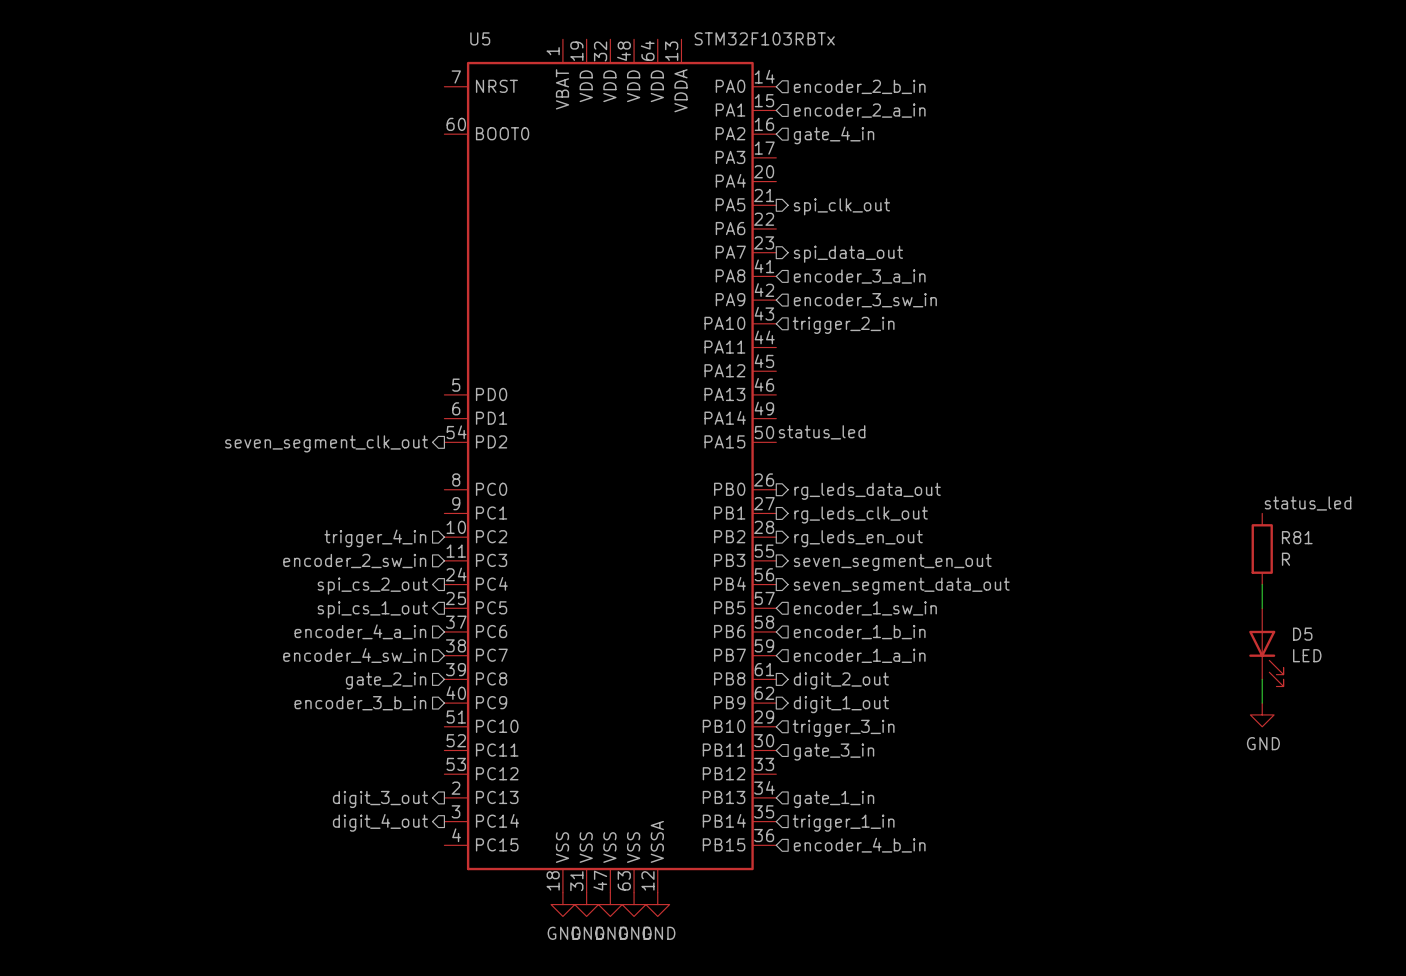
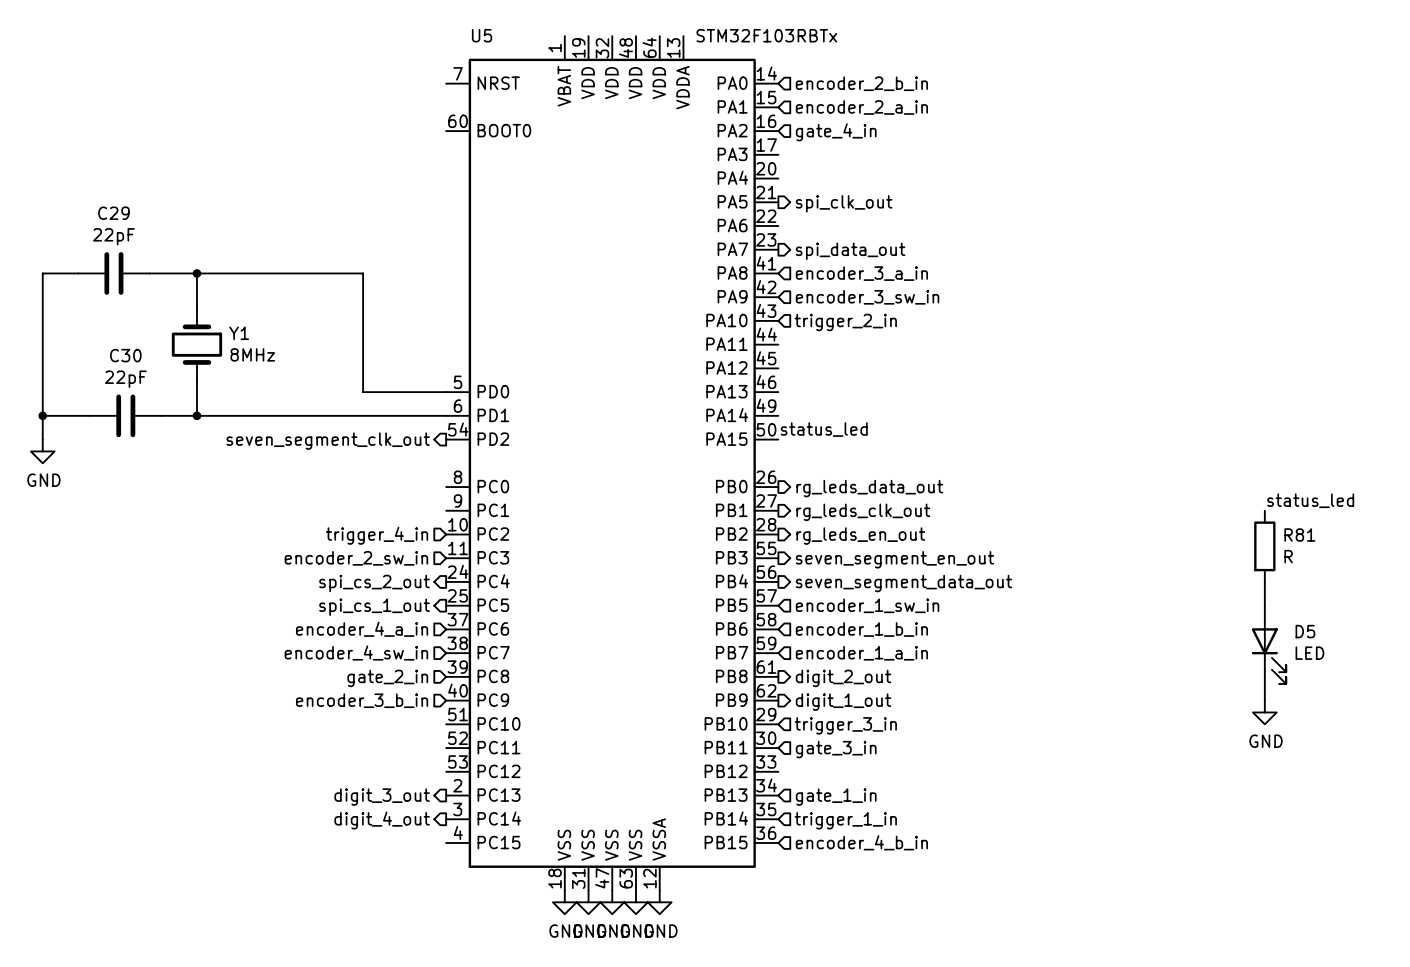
wire: none -> (78, 273) (42, 273) (42, 439)
C29: none -> 22pF (113, 273)
wire: none -> (149, 273) (363, 273) (363, 392) (446, 392)
wire: none -> (196, 273) (196, 309)
junction: none -> (196, 273)
Y1: none -> 8MHz (196, 344)
wire: none -> (196, 380) (196, 415)
wire: none -> (42, 415) (90, 415)
junction: none -> (42, 415)
C30: none -> 22pF (125, 415)
wire: none -> (161, 415) (446, 415)
junction: none -> (196, 415)
power symbol: none -> GND (42, 451)

